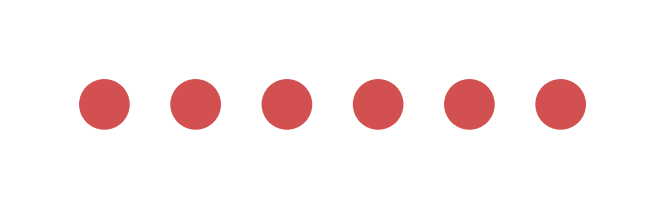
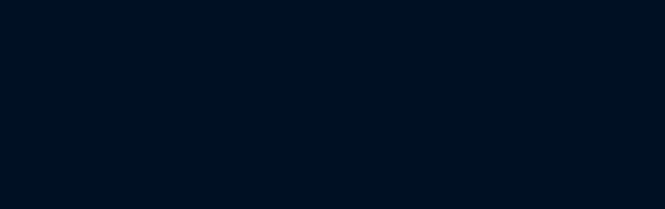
part: (104, 104) -> none
part: (195, 104) -> none
part: (286, 104) -> none
part: (378, 104) -> none
part: (469, 104) -> none
part: (560, 104) -> none

